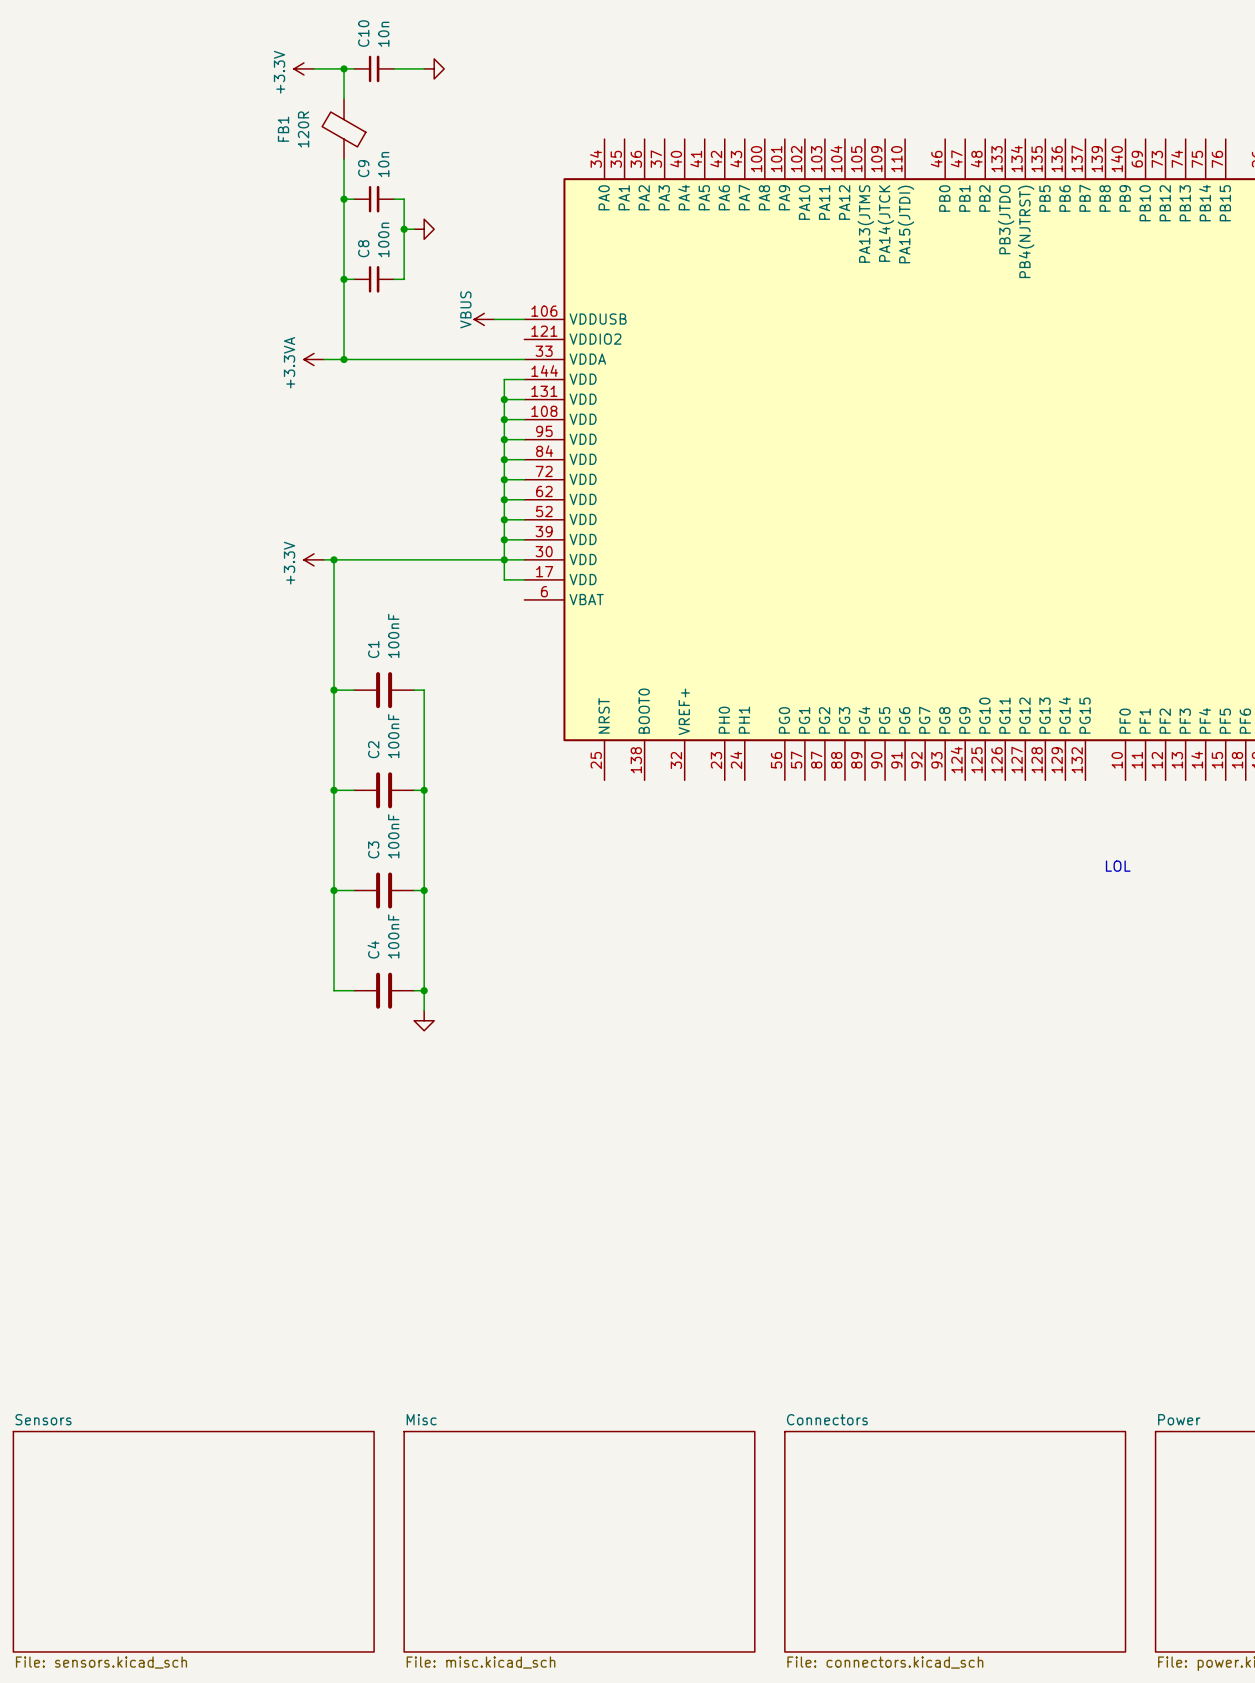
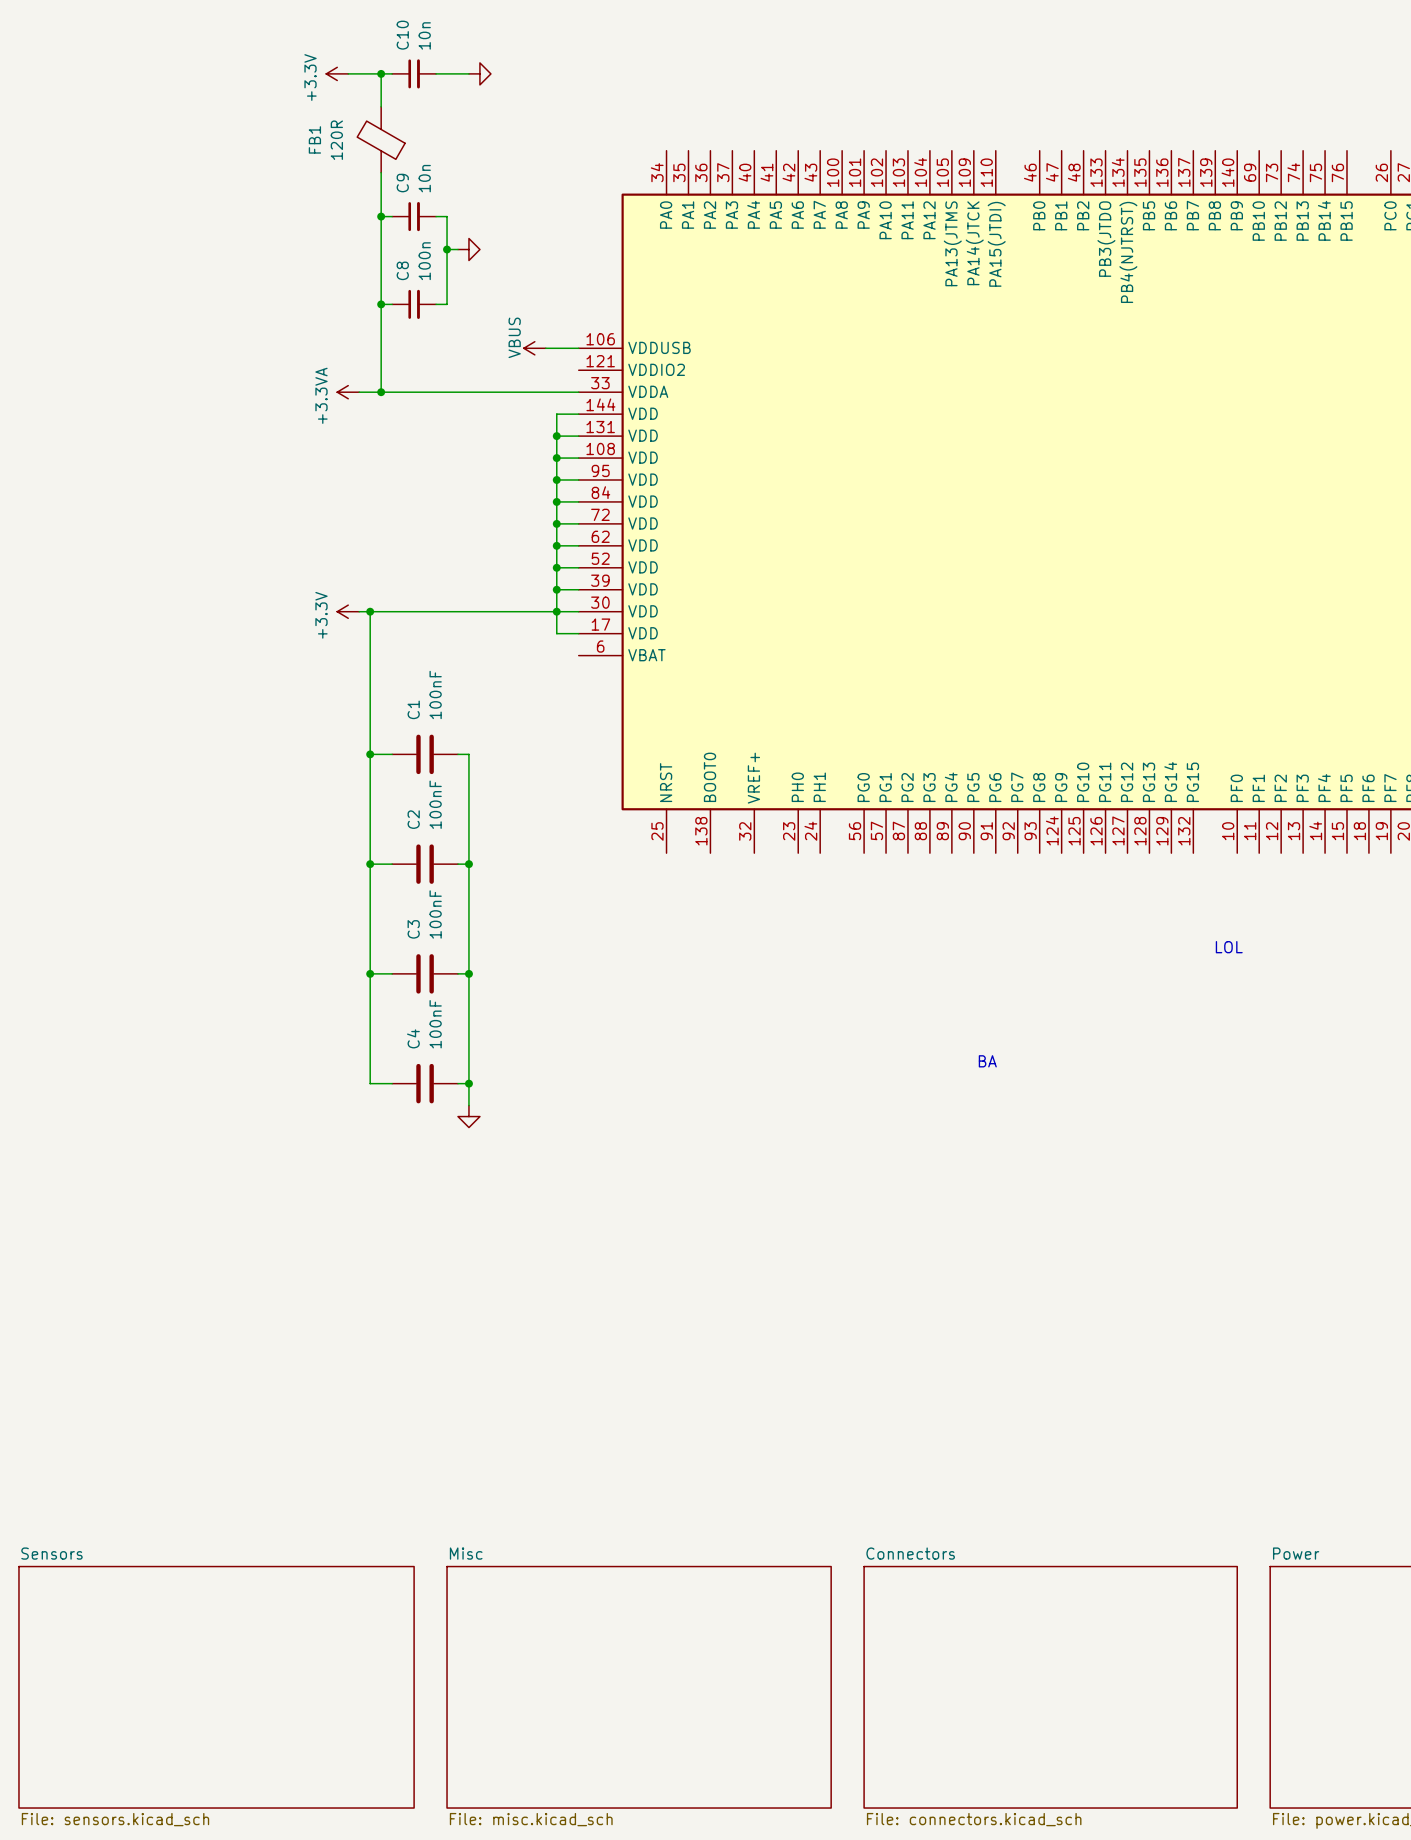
text: none -> BA (987, 1061)

